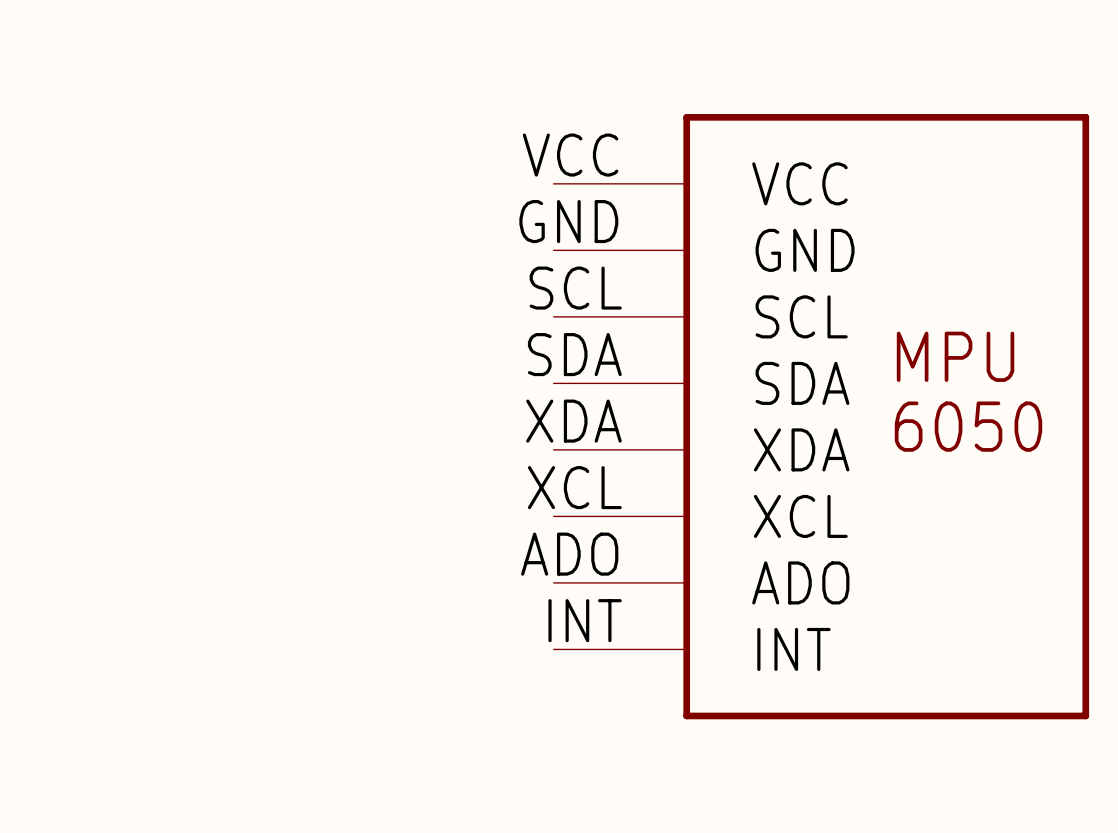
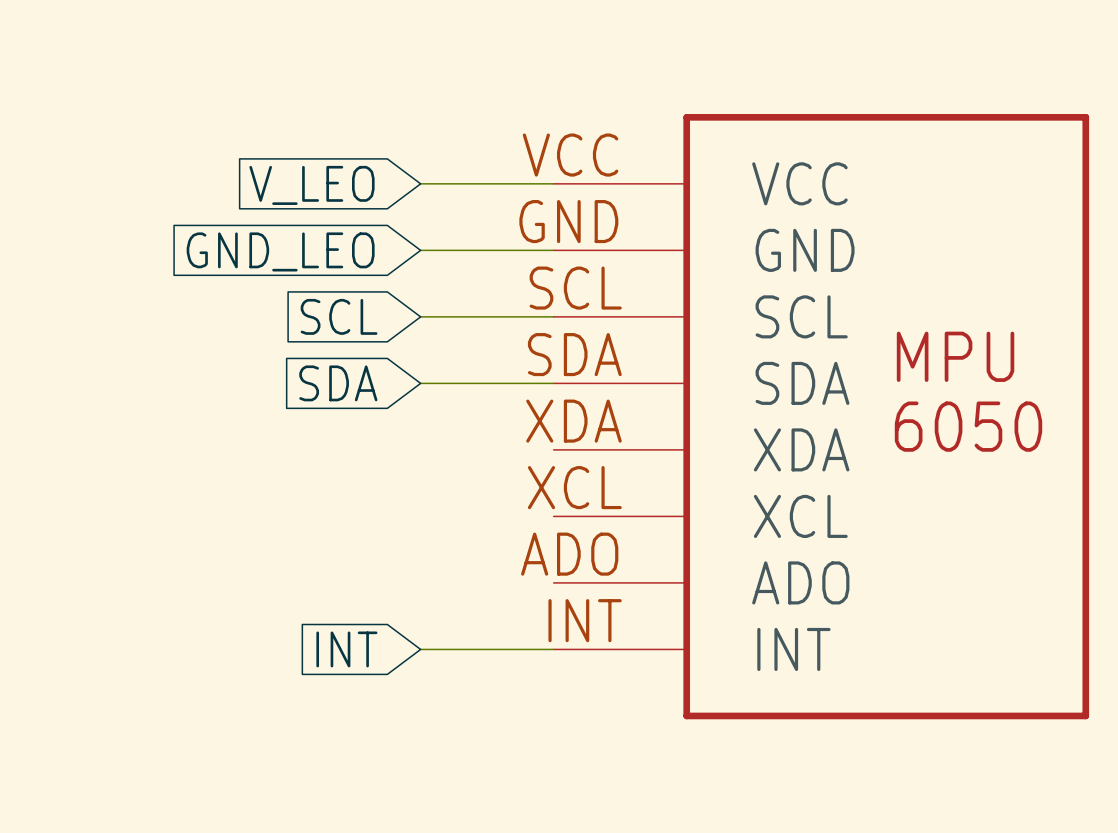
wire: none -> (420, 183) (553, 183)
global label: none -> V_LEO (311, 185)
wire: none -> (420, 250) (553, 250)
global label: none -> GND_LEO (280, 251)
global label: none -> SCL (339, 316)
wire: none -> (420, 316) (553, 316)
global label: none -> SDA (338, 383)
wire: none -> (420, 383) (553, 383)
global label: none -> INT (346, 649)
wire: none -> (420, 649) (553, 649)

